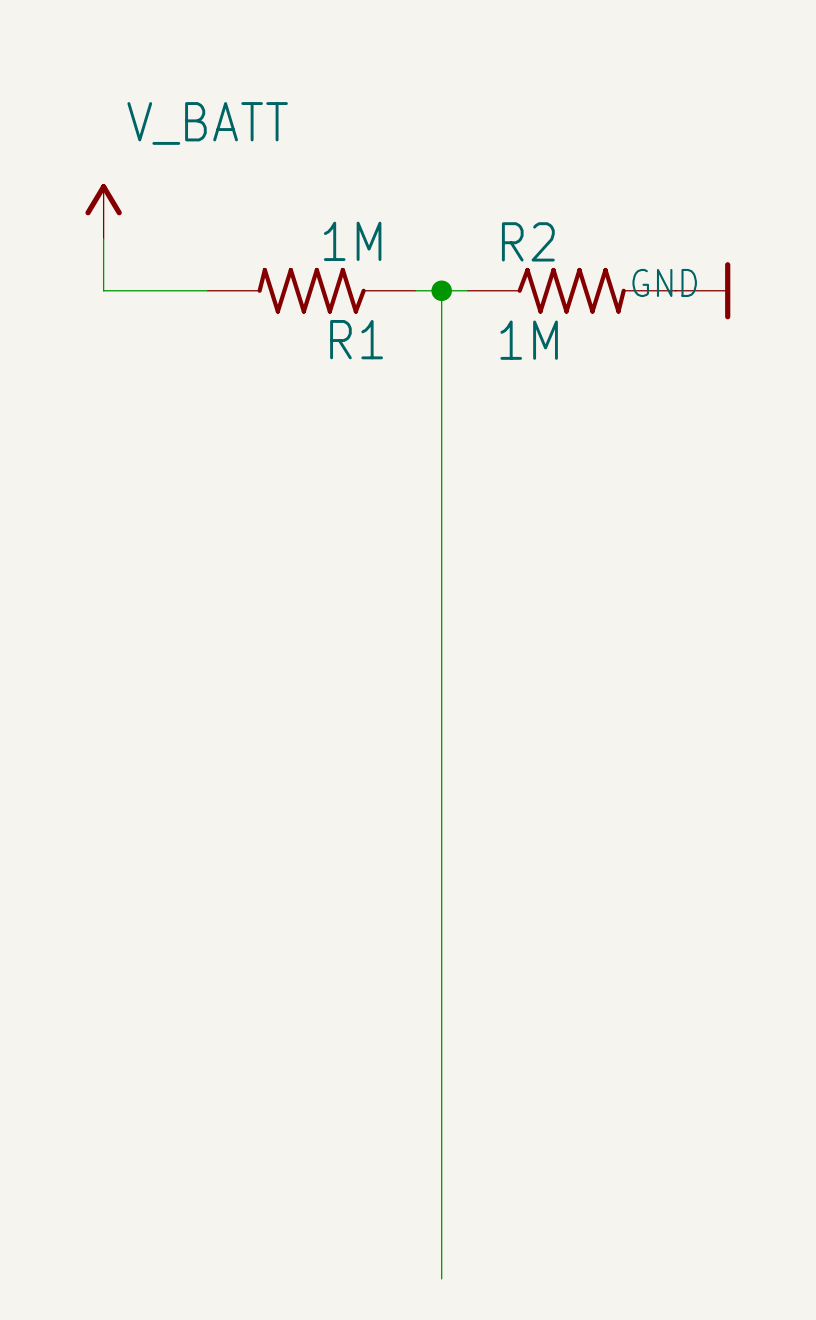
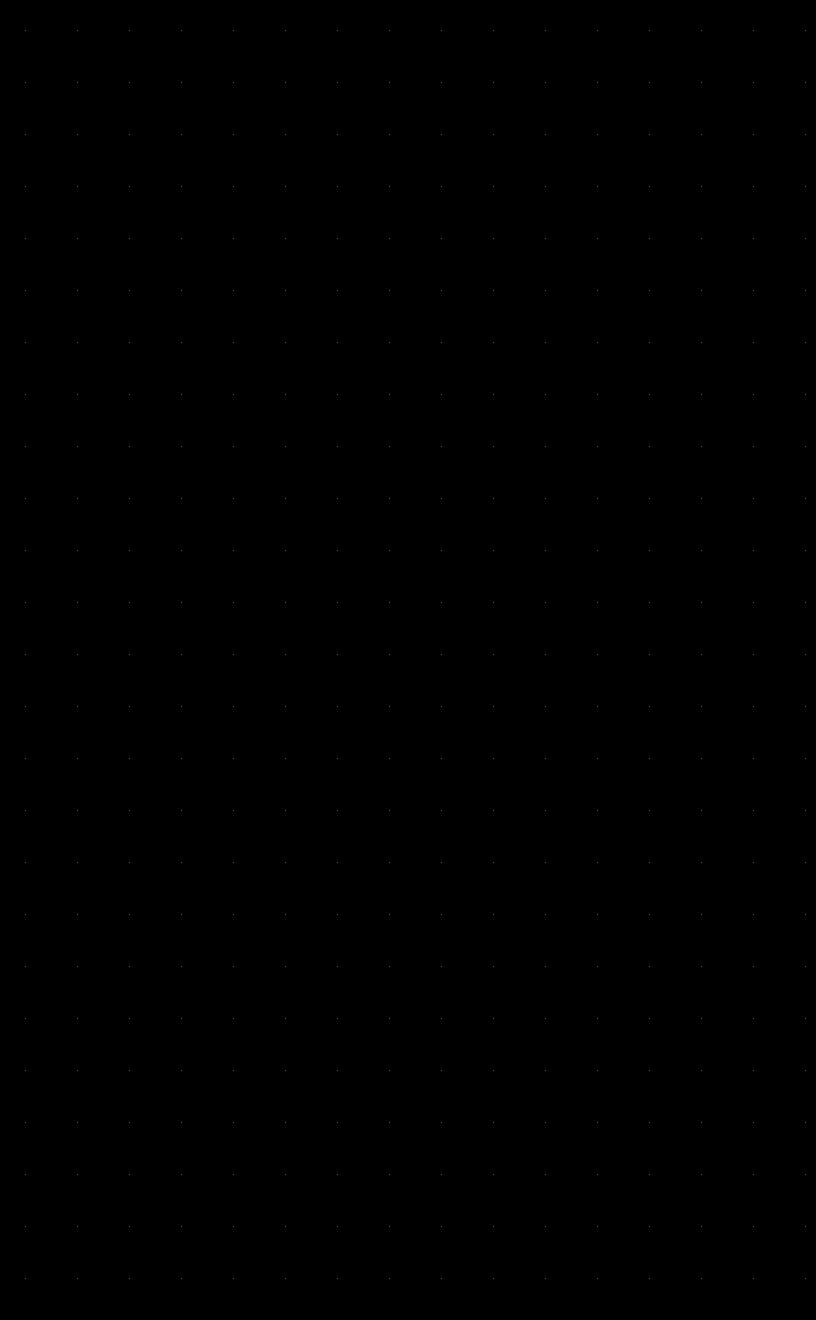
power symbol: V_BATT (103, 211) -> none
wire: (103, 238) (103, 290) (207, 290) -> none
R1: 1M (311, 290) -> none
wire: (415, 290) (467, 290) -> none
wire: (441, 290) (441, 1278) -> none
junction: (441, 290) -> none
R2: 1M (571, 290) -> none
power symbol: GND (703, 290) -> none

